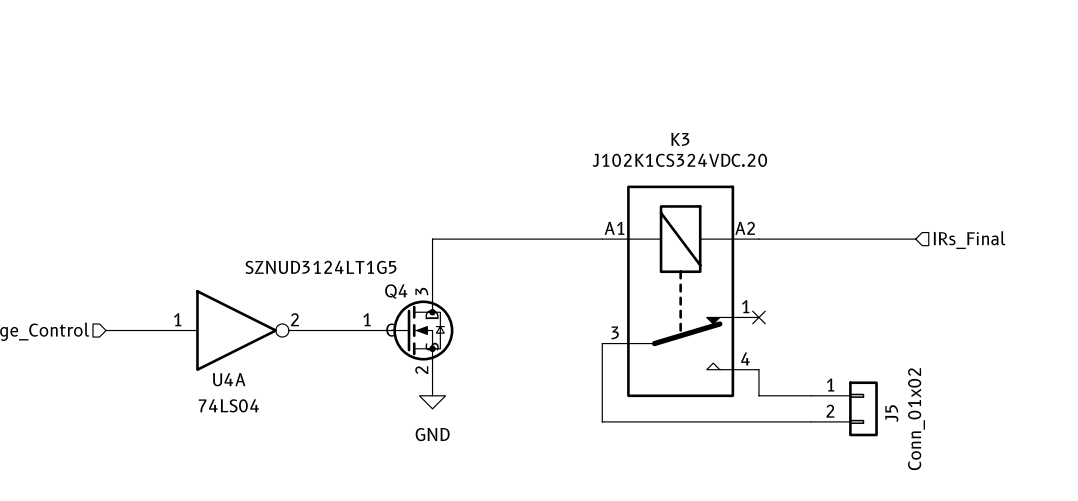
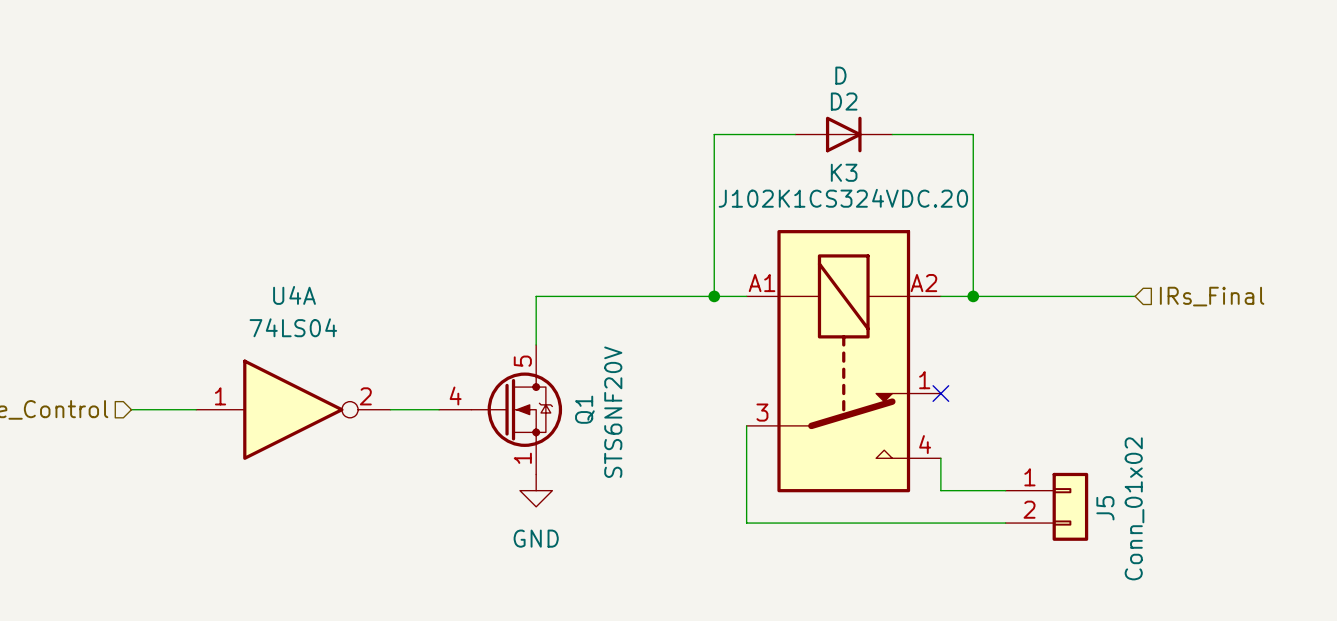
wire: none -> (795, 134) (714, 134) (714, 296)
D2: none -> D (843, 134)
wire: none -> (892, 134) (973, 134) (973, 296)
junction: none -> (714, 296)
junction: none -> (973, 296)
SZNUD3124LT1G5: Q4 (403, 330) -> none
Q1: none -> STS6NF20V (500, 409)
U4A name position: U4A (229, 379) -> U4A (294, 295)
U4A value position: 74LS04 (228, 405) -> 74LS04 (293, 327)

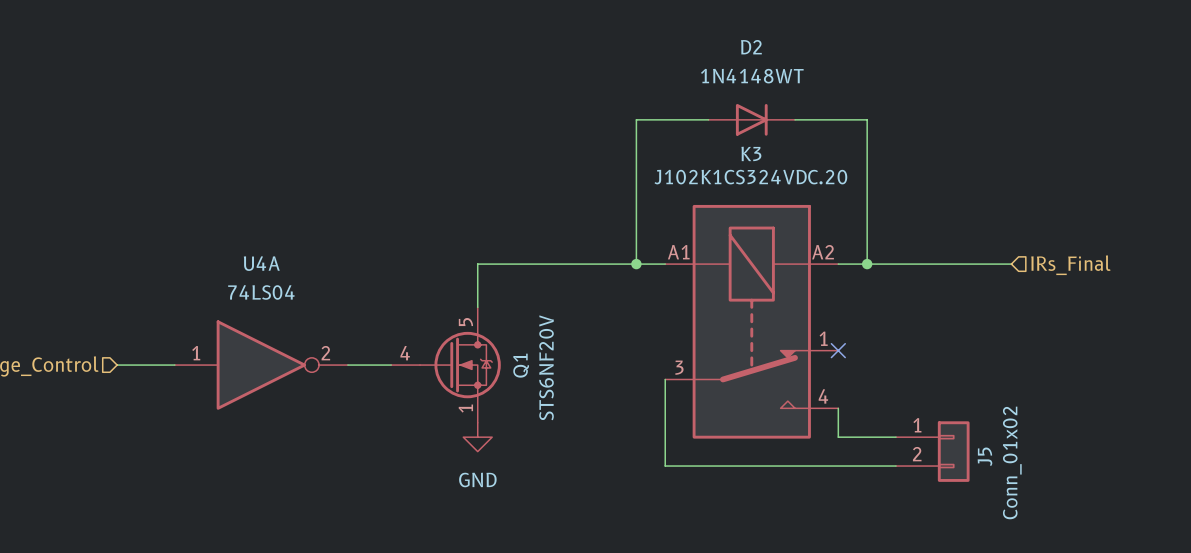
D2 value: D (840, 75) -> 1N4148WT (752, 76)
D2 name position: D2 (844, 101) -> D2 (751, 47)

